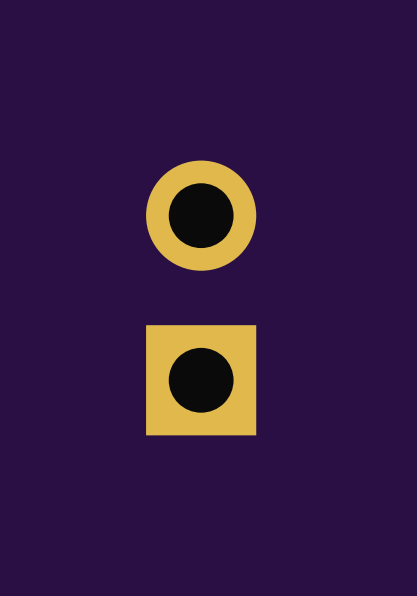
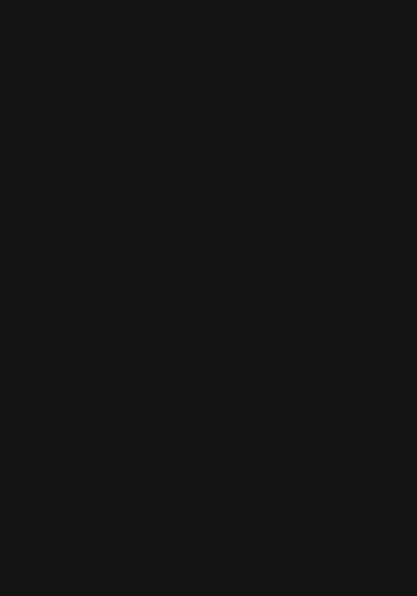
part: (201, 297) -> none

